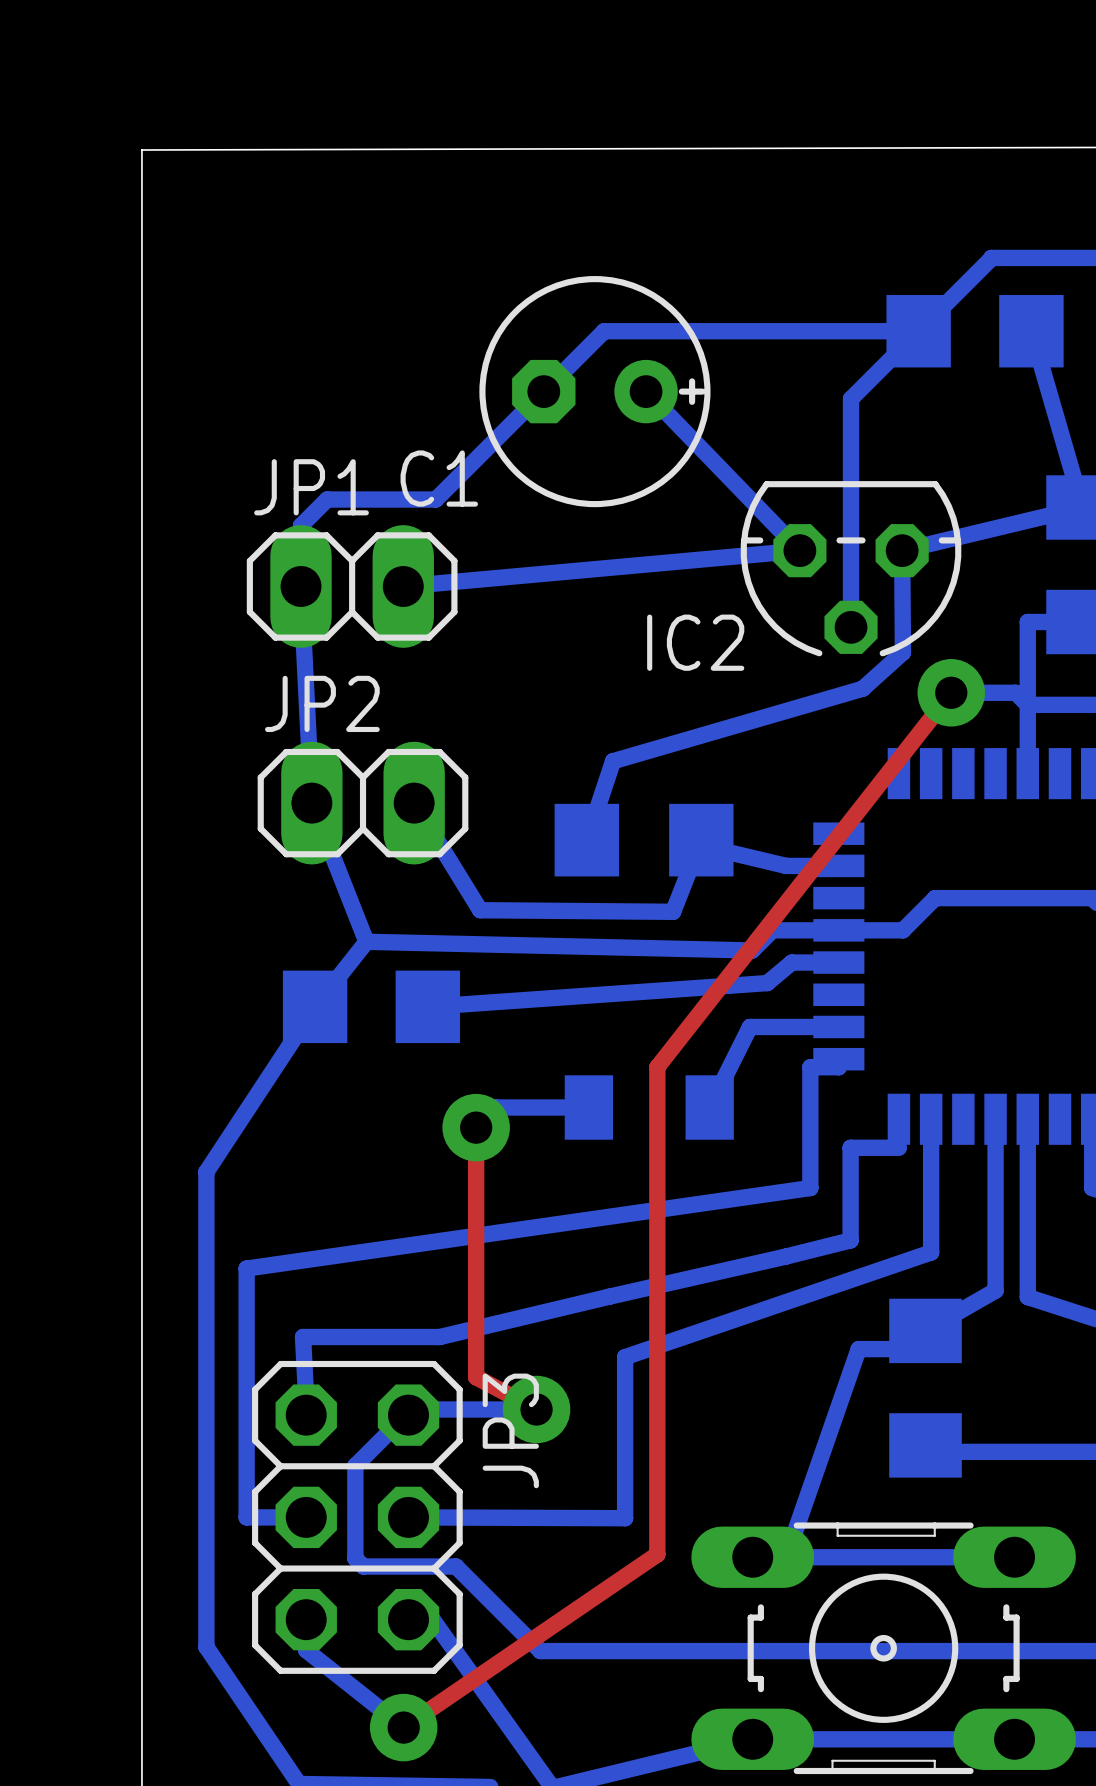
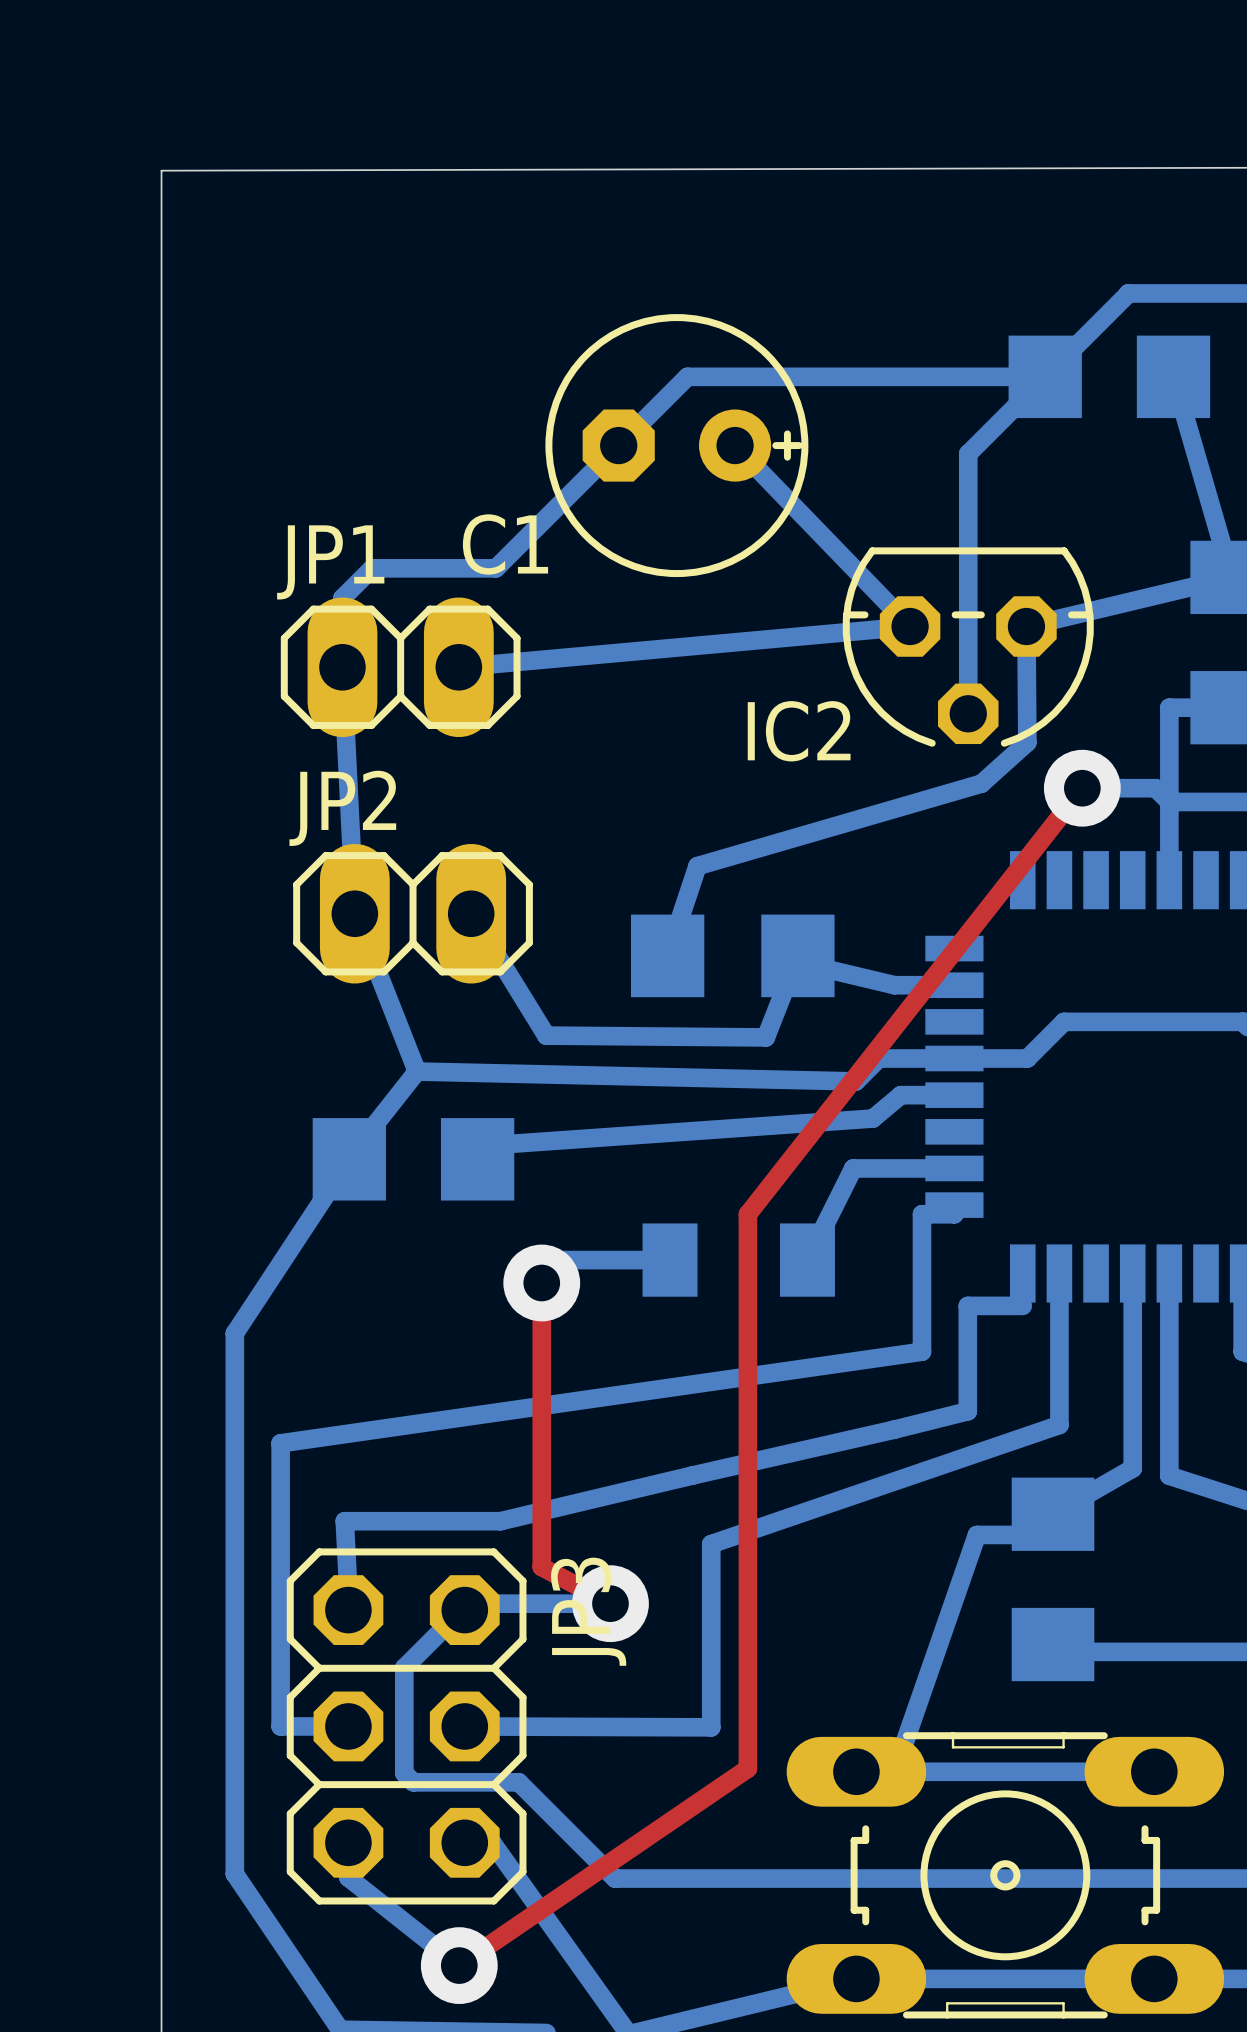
part position: (371, 1006) -> (413, 1159)

